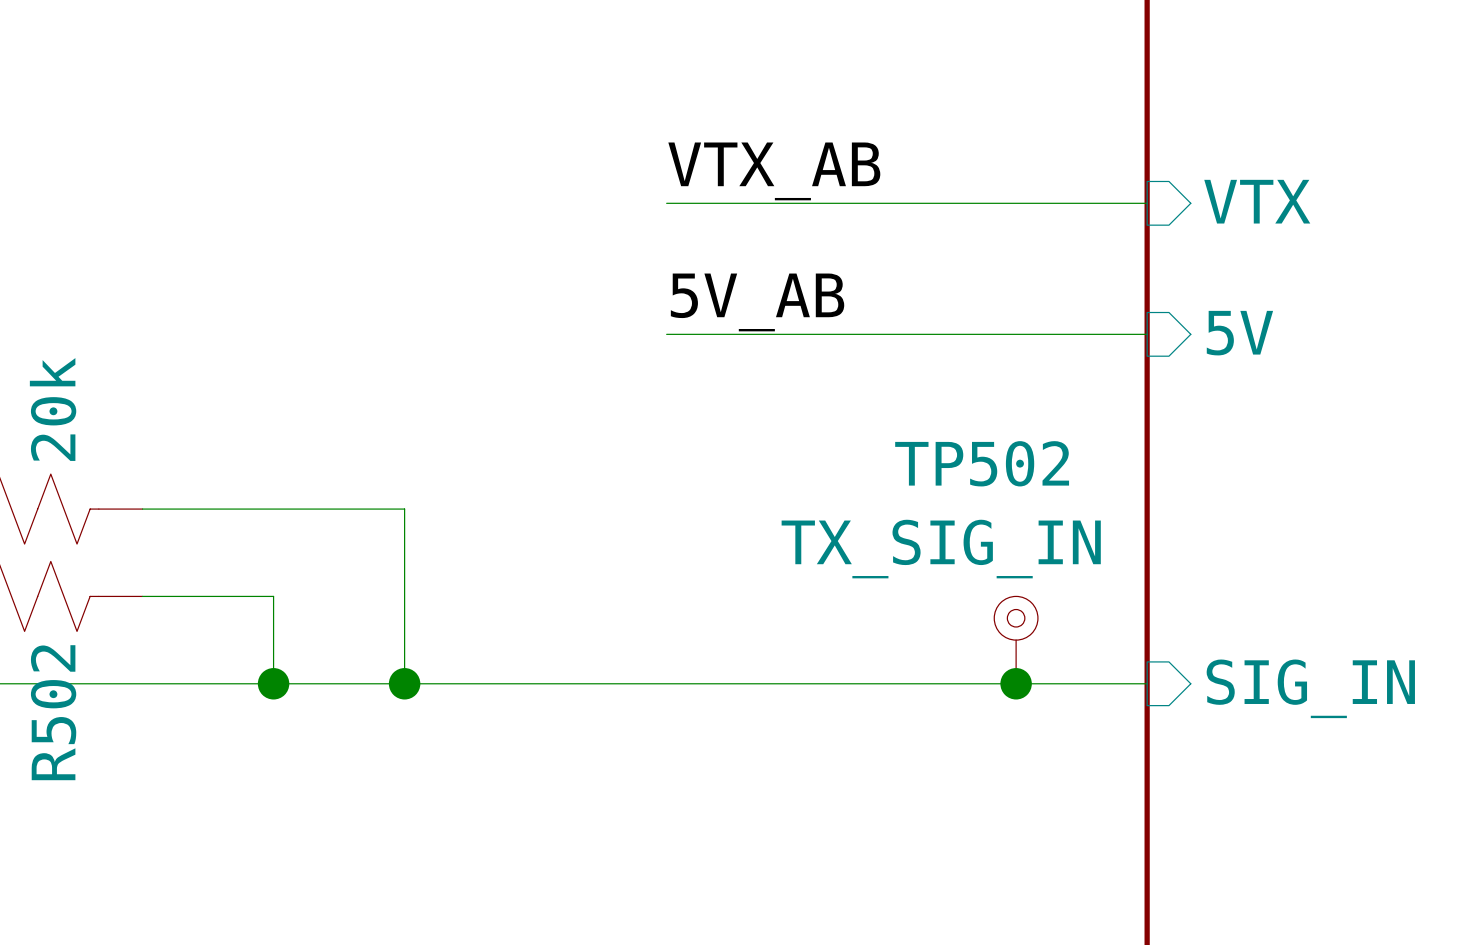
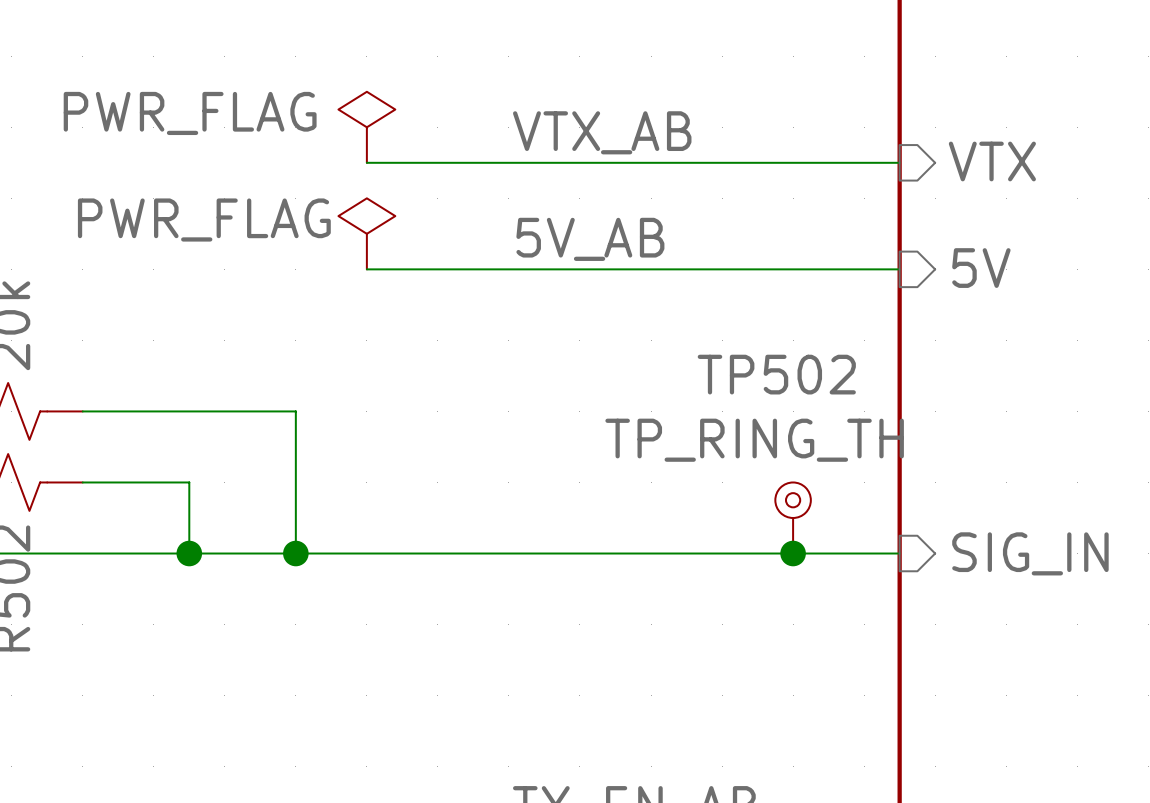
power symbol: none -> PWR_FLAG (366, 127)
wire: none -> (366, 162) (508, 162)
power symbol: none -> PWR_FLAG (366, 233)
wire: none -> (366, 269) (508, 269)
TP502 value: TX_SIG_IN (941, 549) -> TP_RING_TH (754, 440)

